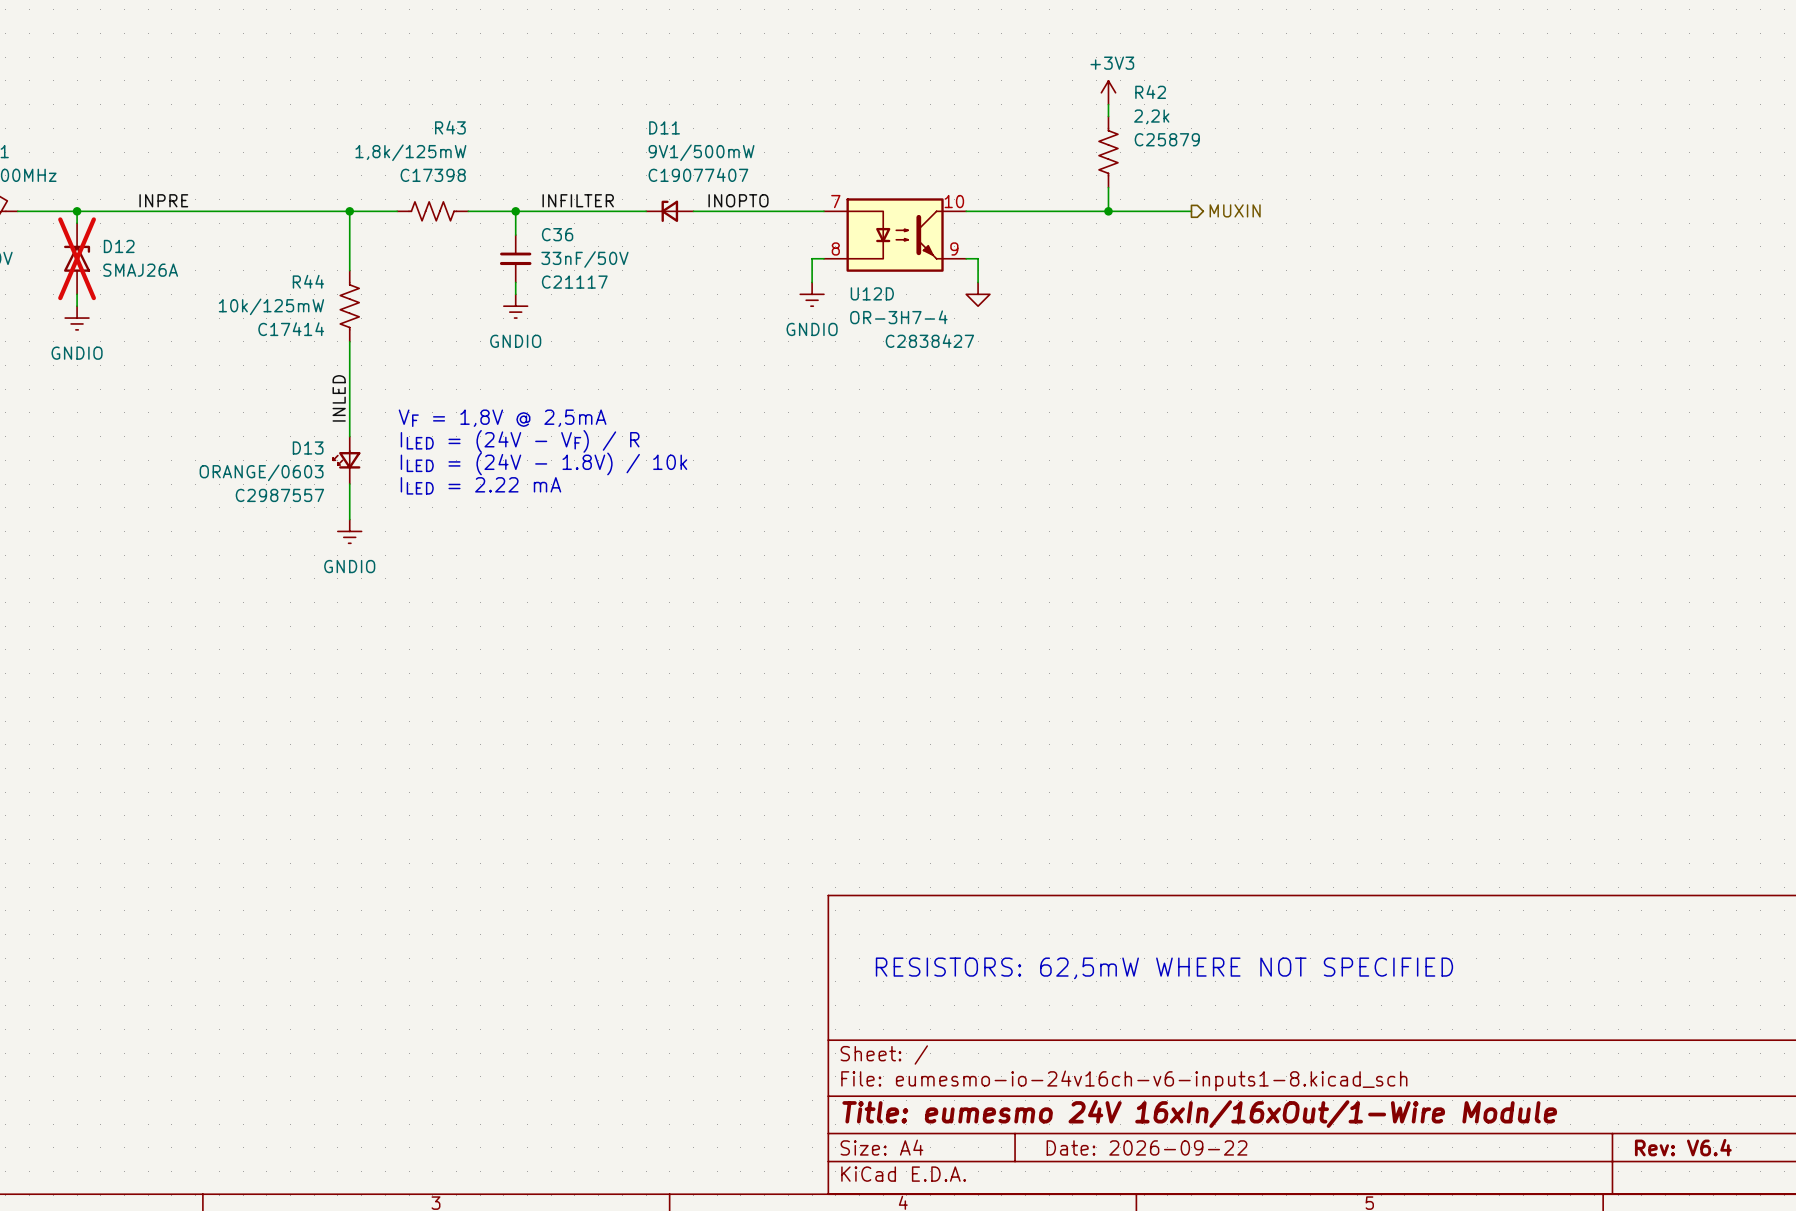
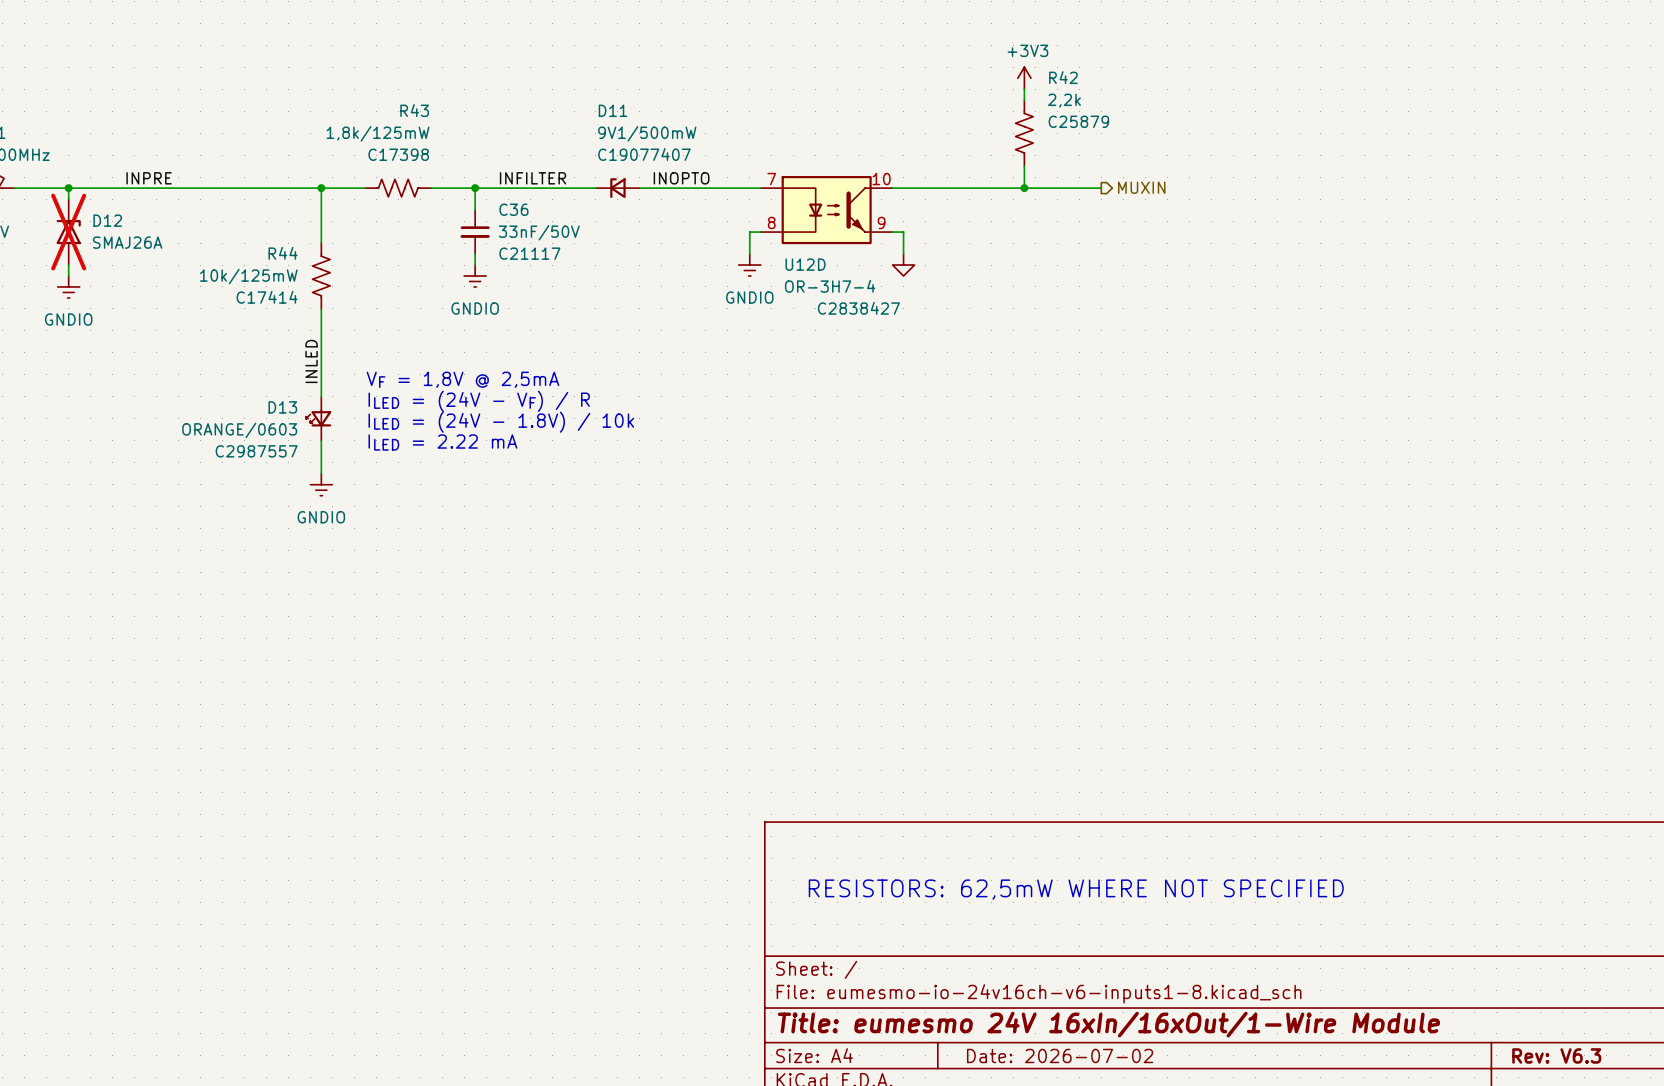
title block: Date: 2026-09-22 (1146, 1147) -> Date: 2026-07-02 (1060, 1055)
title block: Rev: V6.4 (1683, 1147) -> Rev: V6.3 (1556, 1055)

